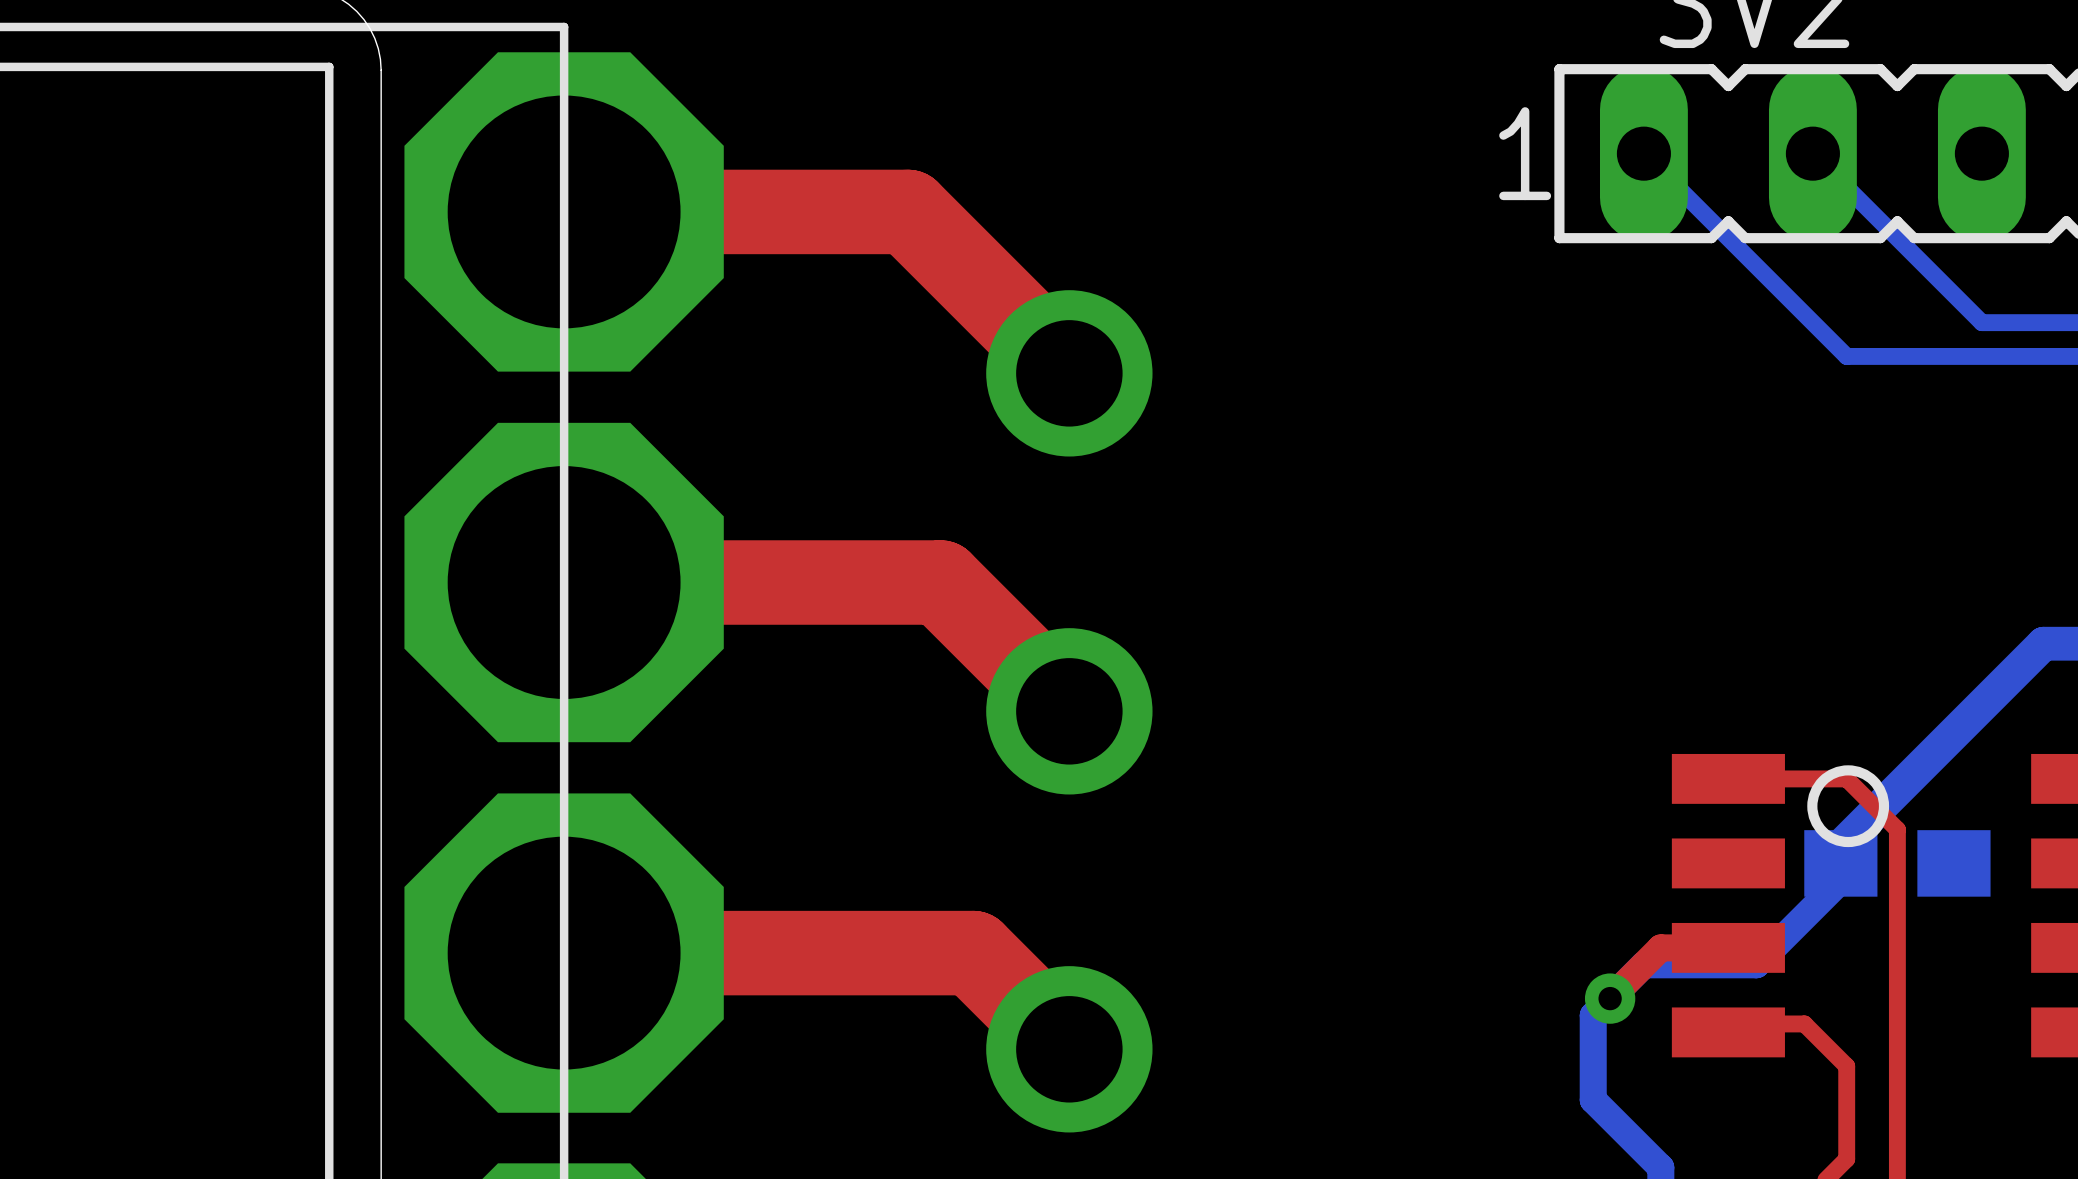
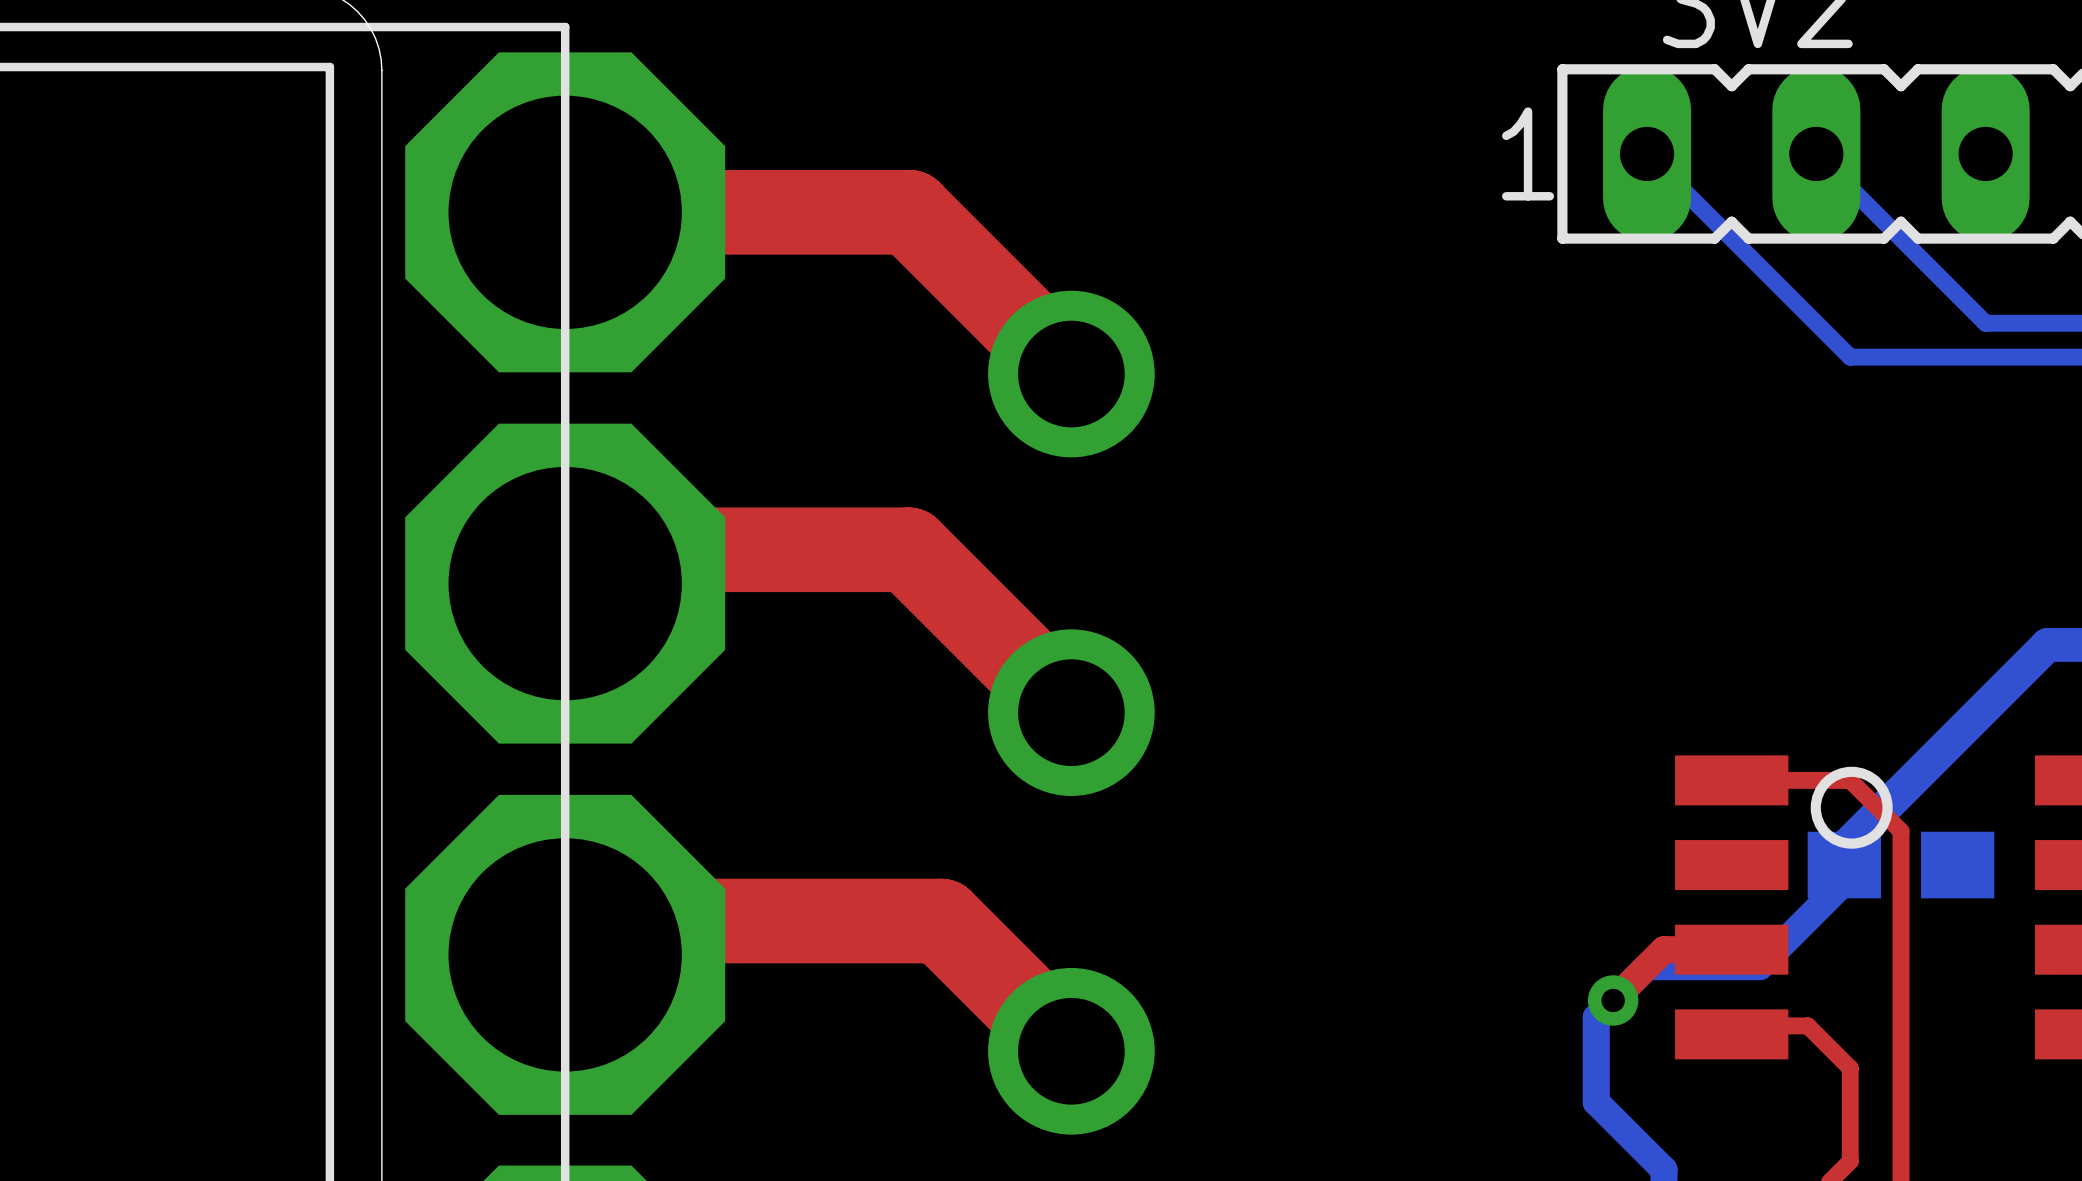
top track: (564, 582) (940, 582) -> (565, 549) (908, 549) (942, 583)
top track: (564, 953) (973, 953) -> (565, 921) (941, 921) (975, 954)

